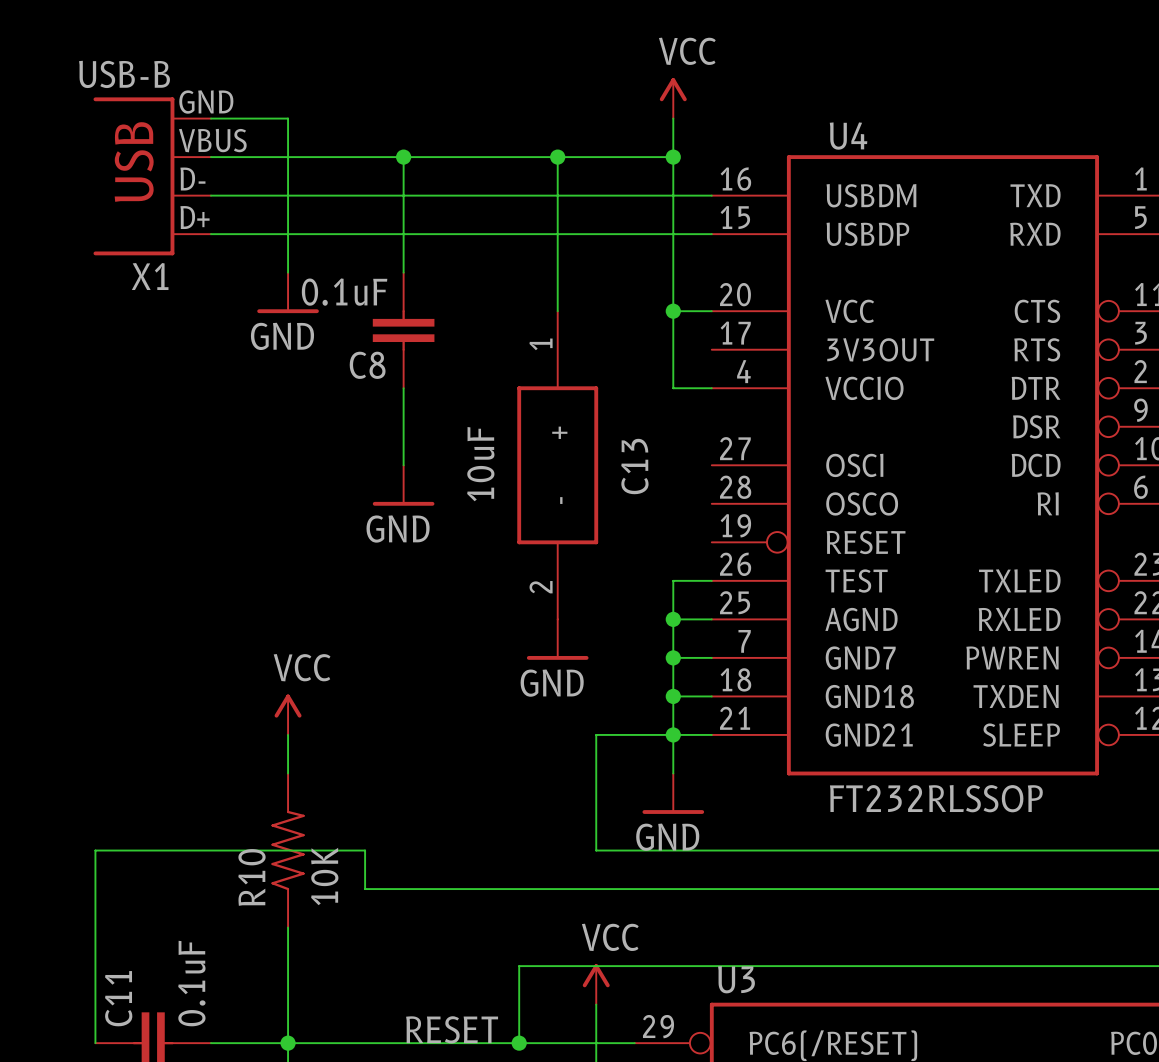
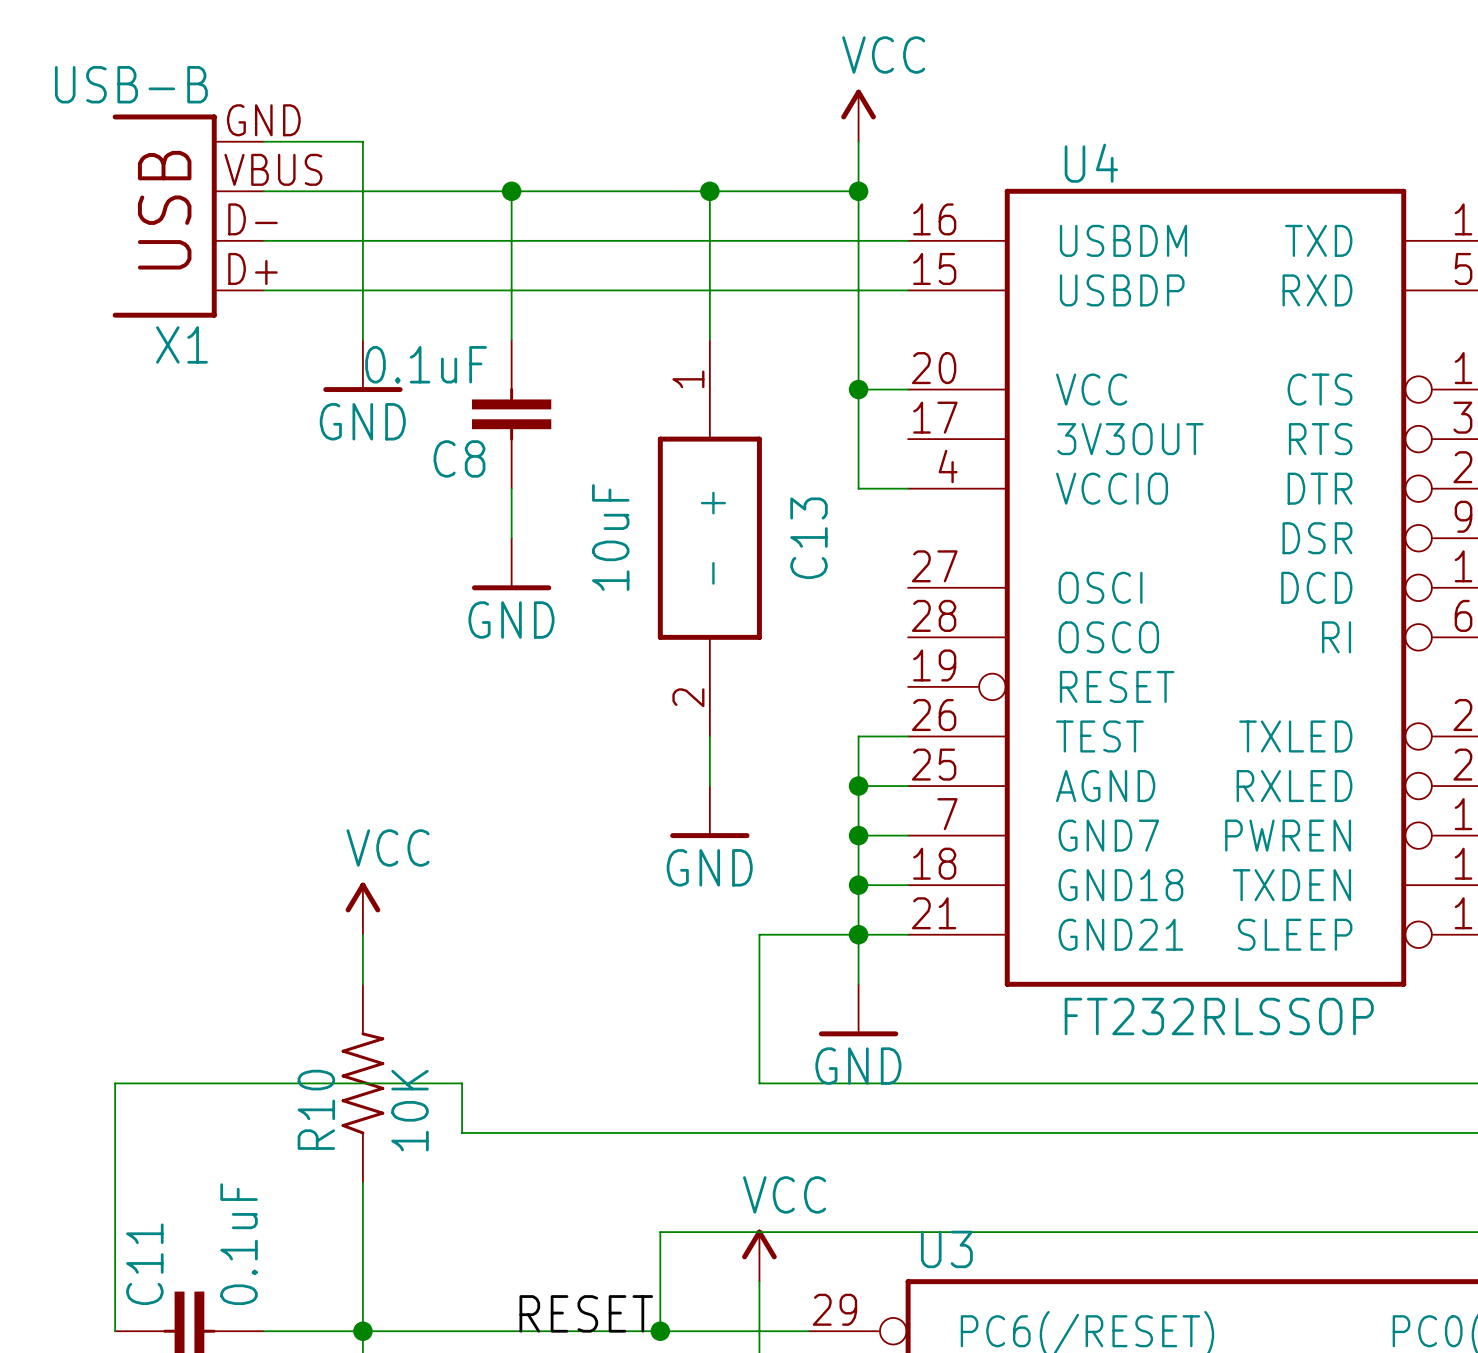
C13 position: (557, 465) -> (709, 538)
power symbol position: GND (403, 485) -> GND (511, 564)

